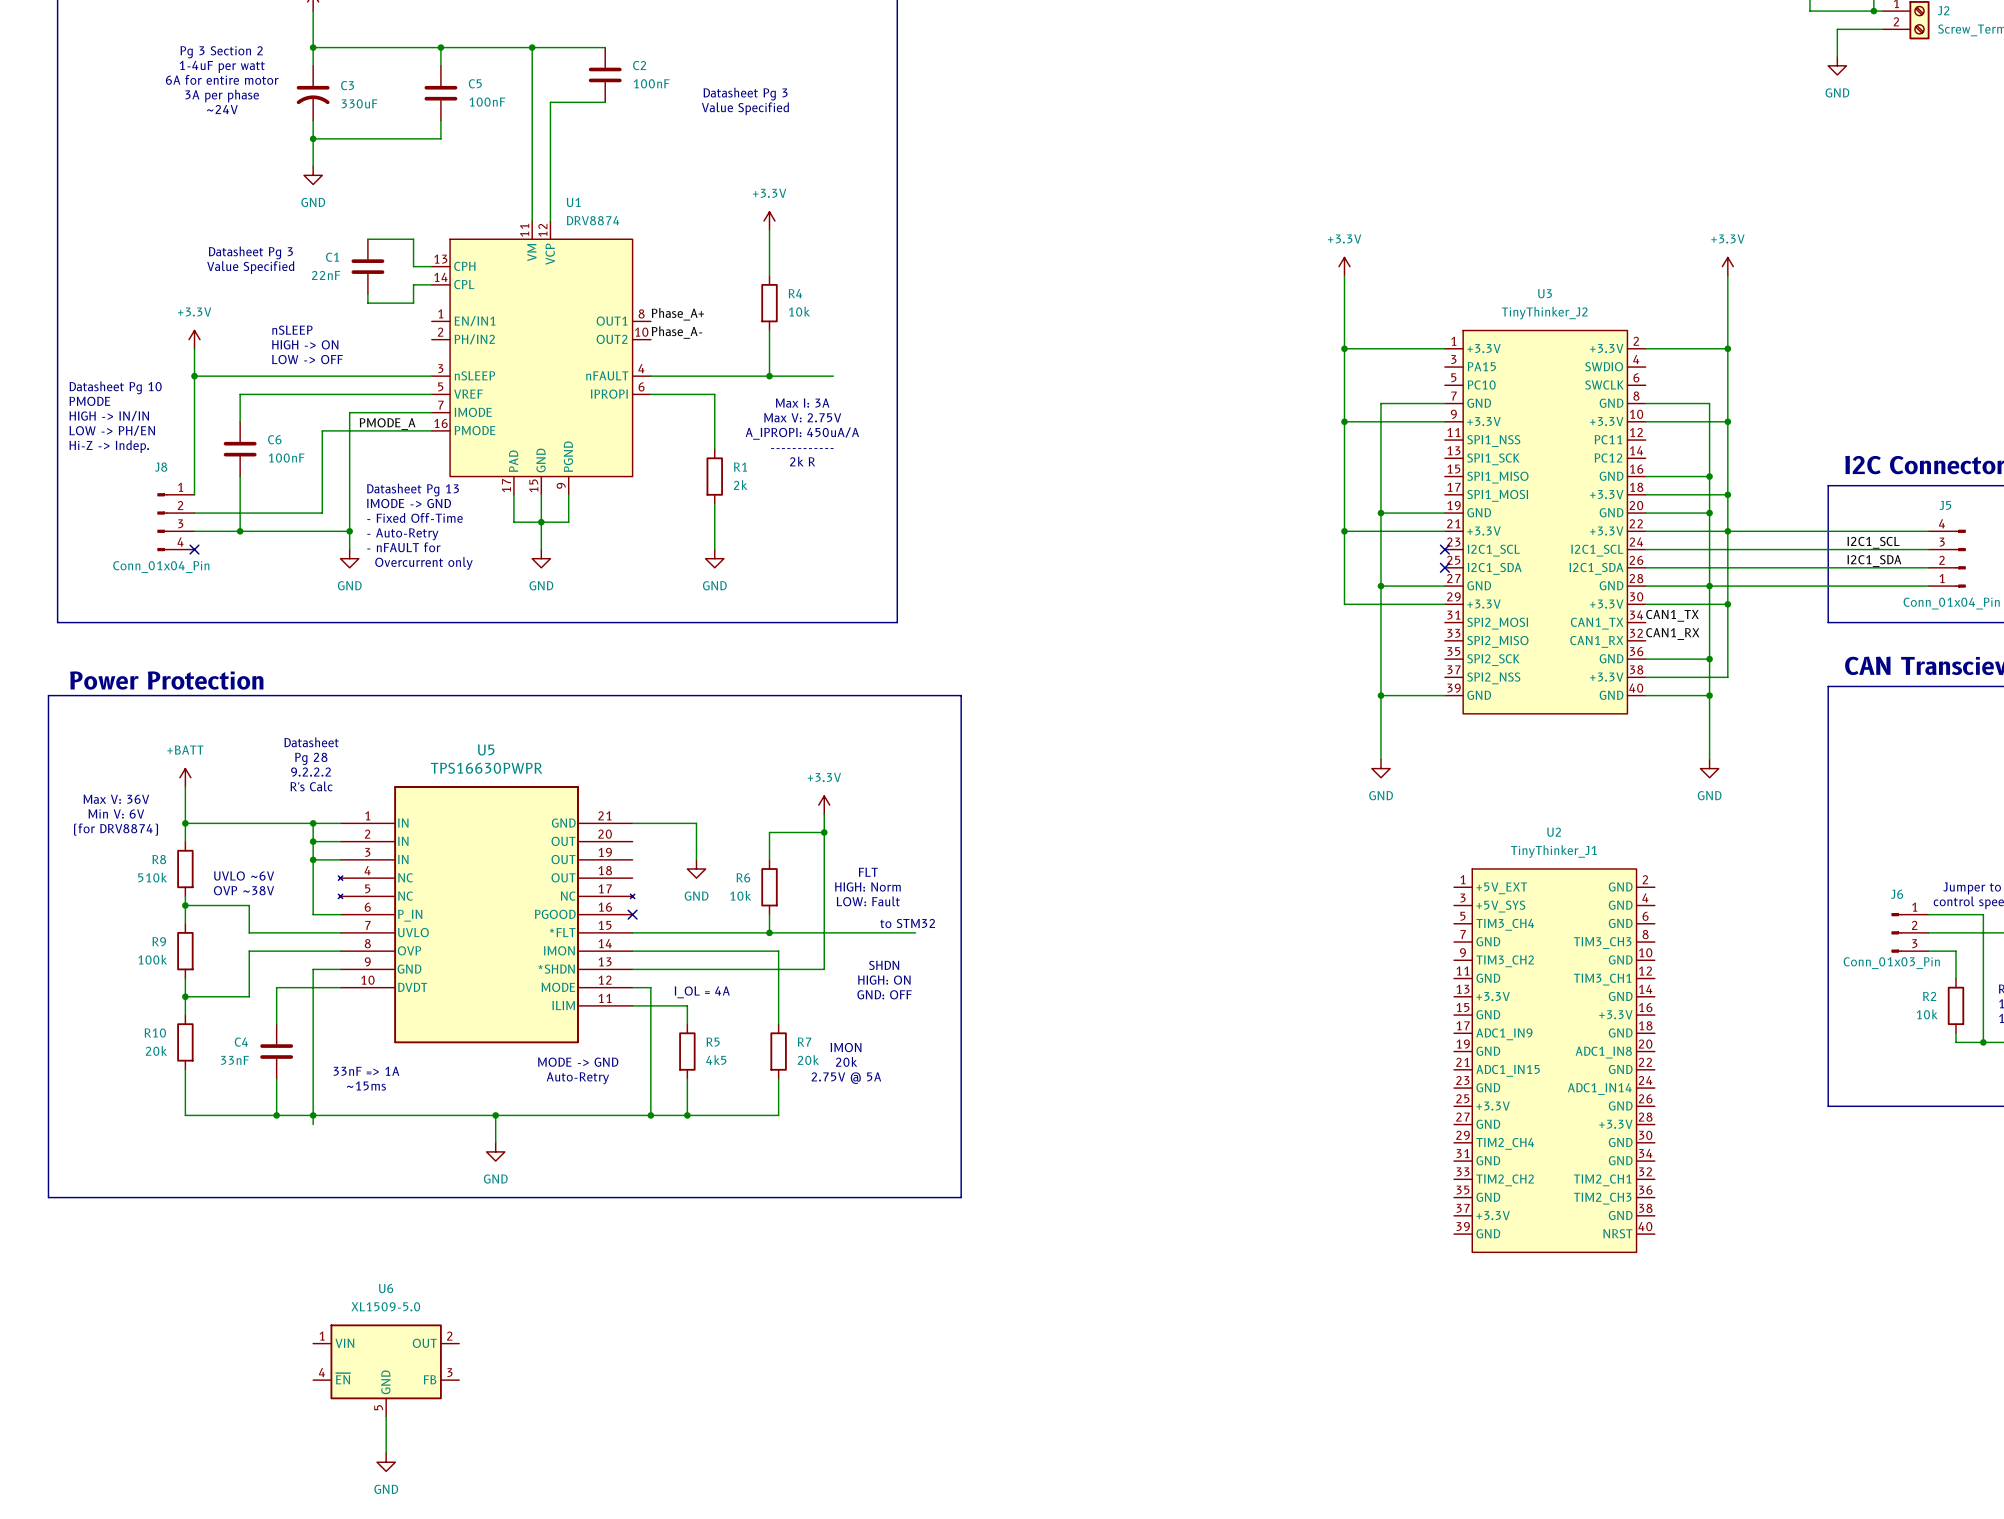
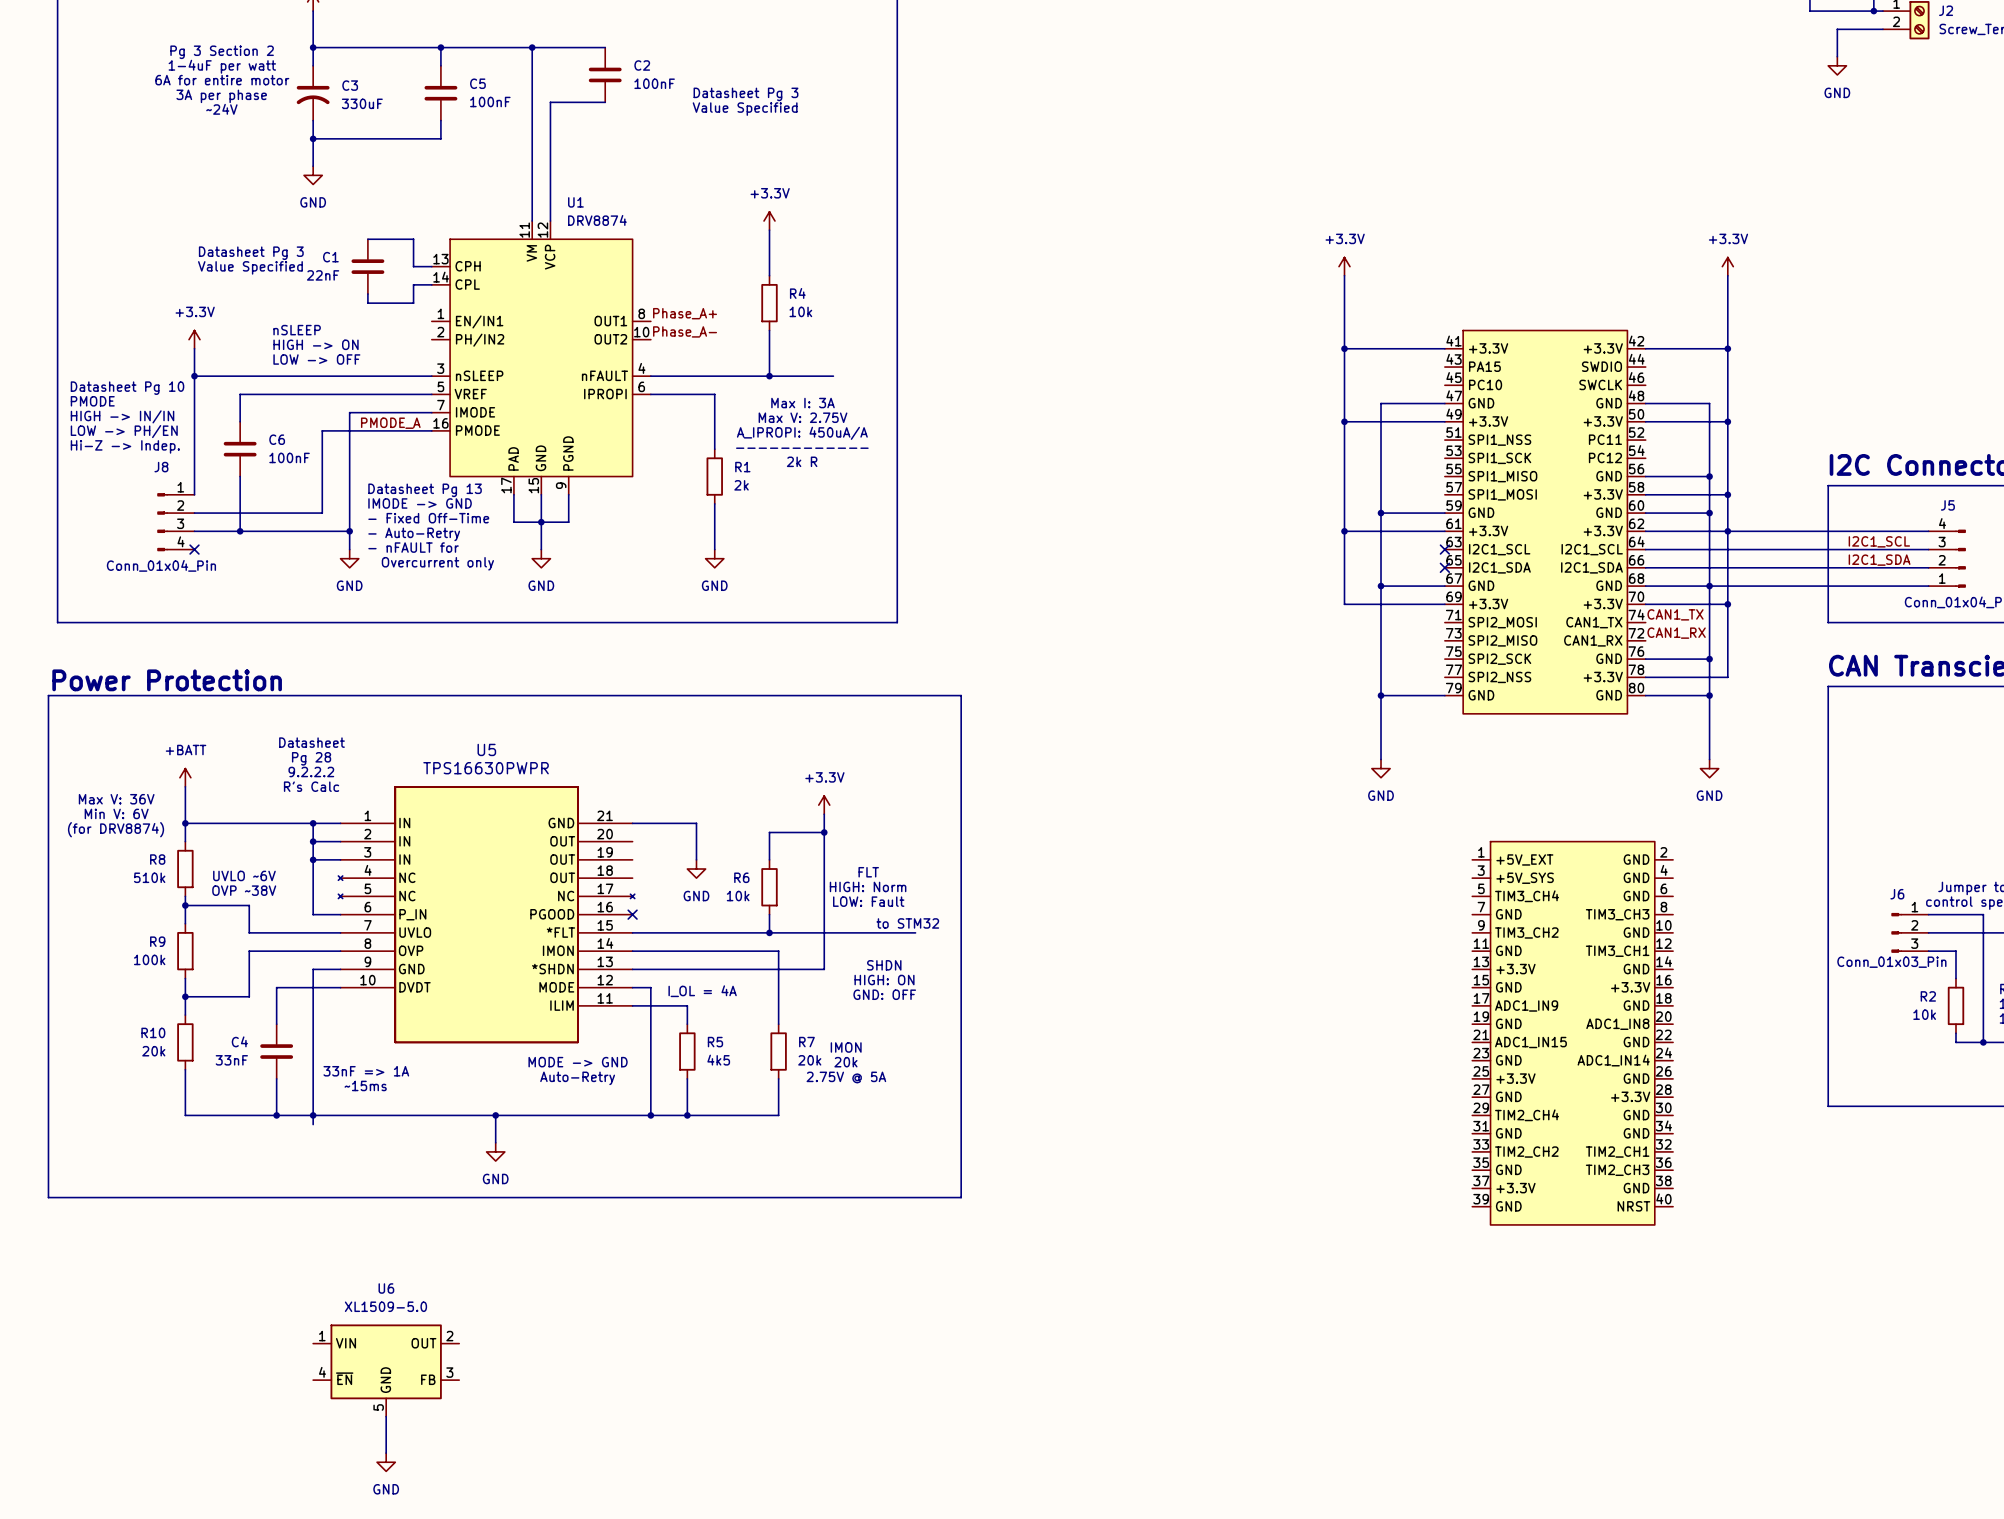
U3 name: U3 (1545, 293) -> none
U3 value: TinyThinker_J2 (1544, 313) -> none
U3 symbol: [1444, 330, 1646, 714] -> [1444, 330, 1646, 714]
part: none -> (1572, 1033)
U2: TinyThinker_J1 (1554, 1060) -> none

